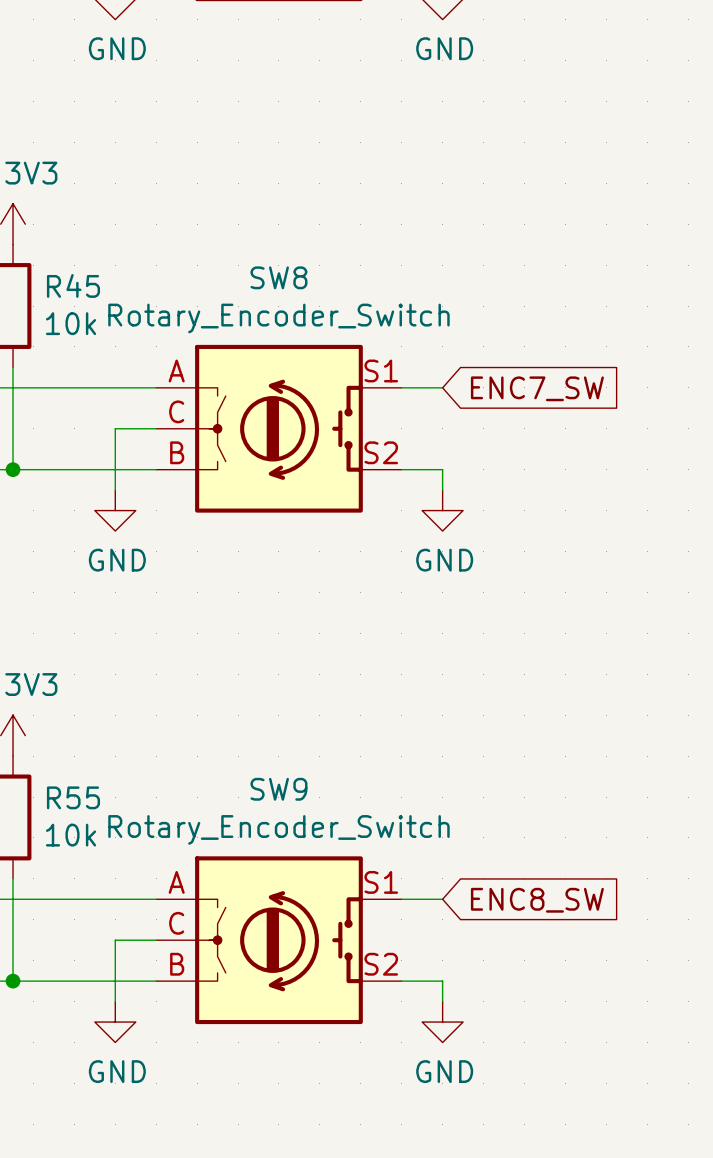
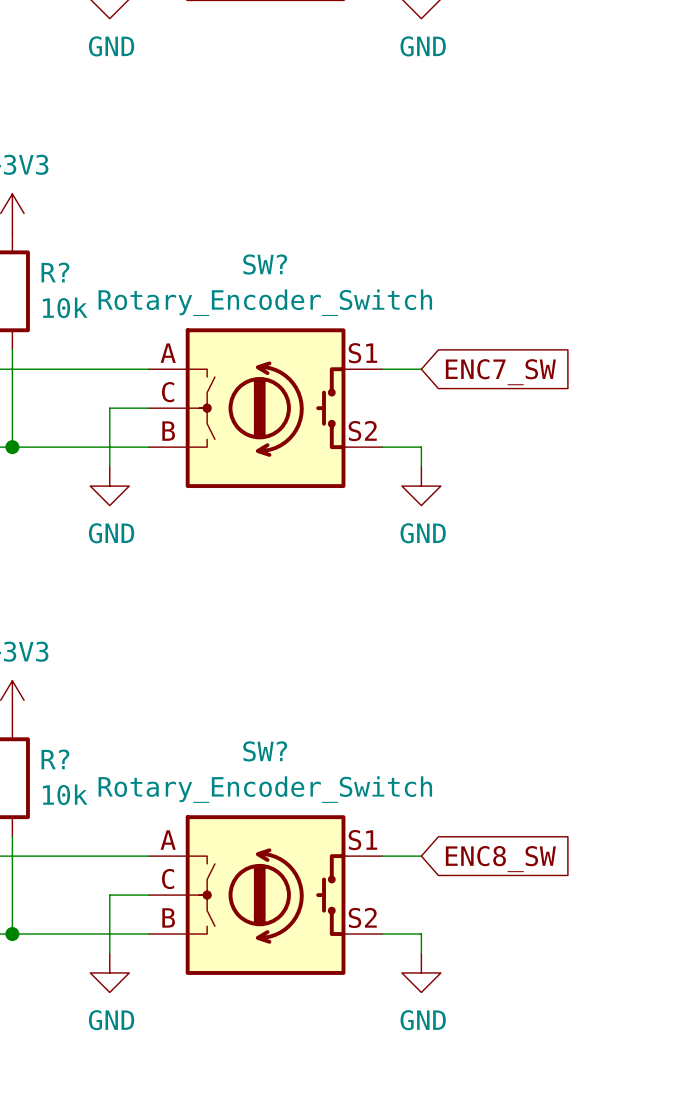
SW8 name: SW8 (278, 277) -> SW? (265, 264)
R45 name: R45 (73, 285) -> R? (55, 272)
SW9 name: SW9 (278, 789) -> SW? (265, 751)
R55 name: R55 (73, 797) -> R? (55, 759)

